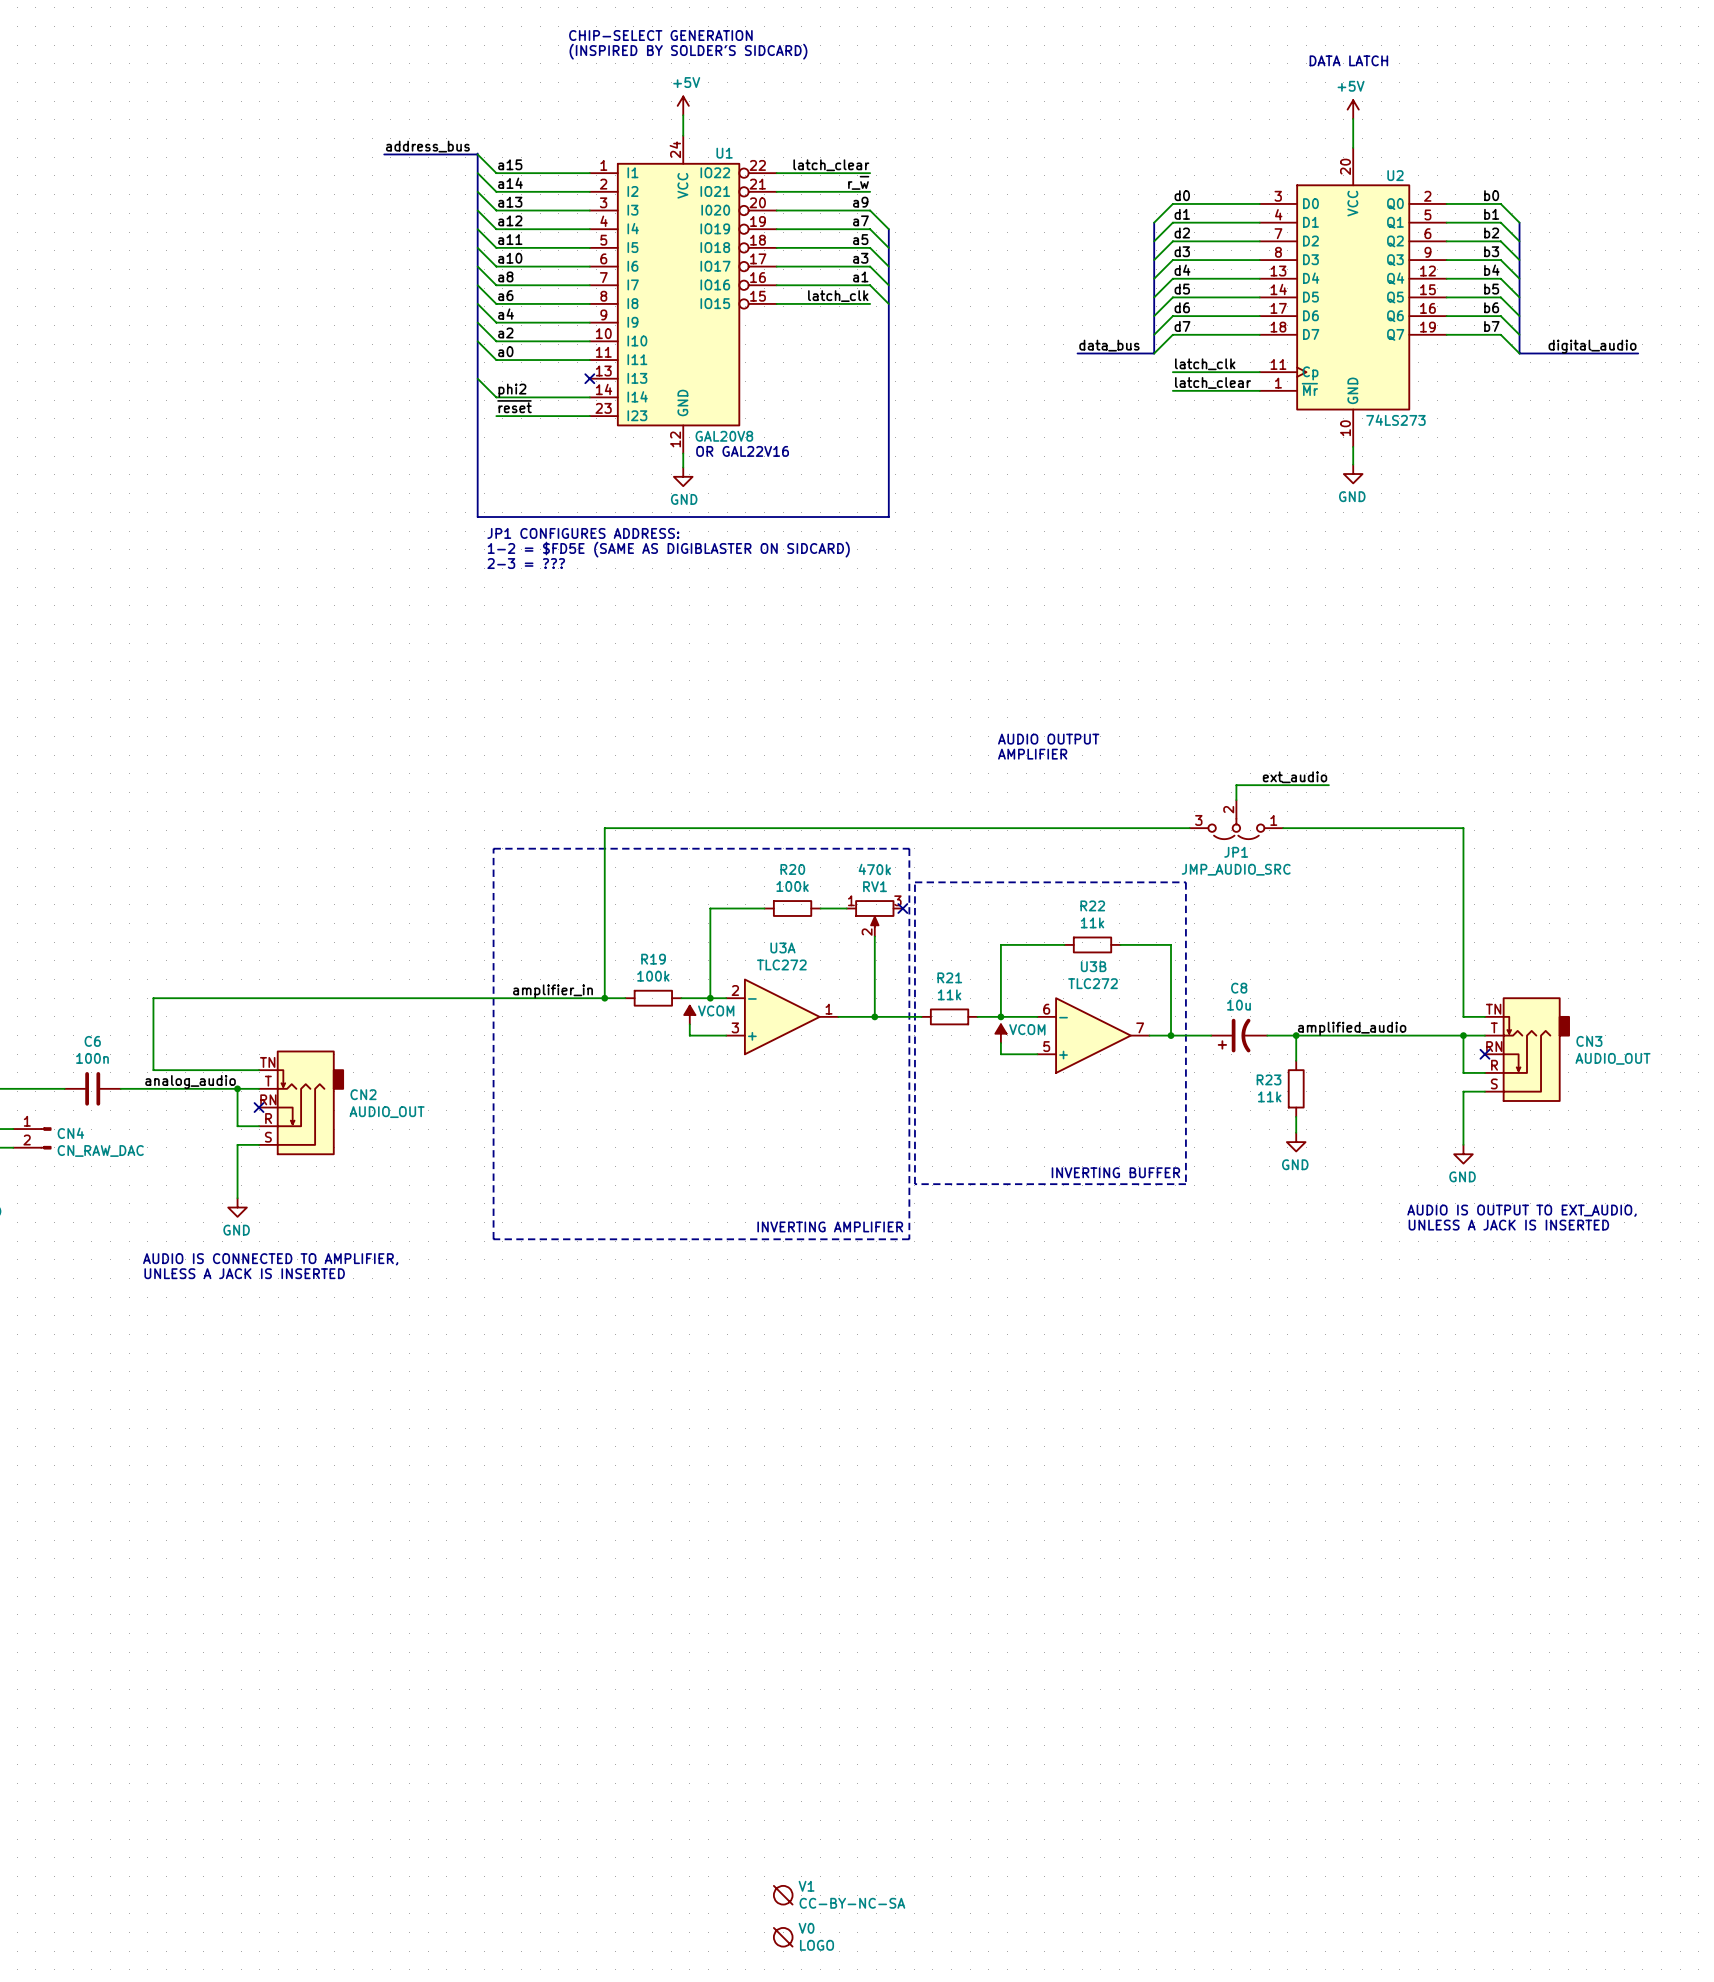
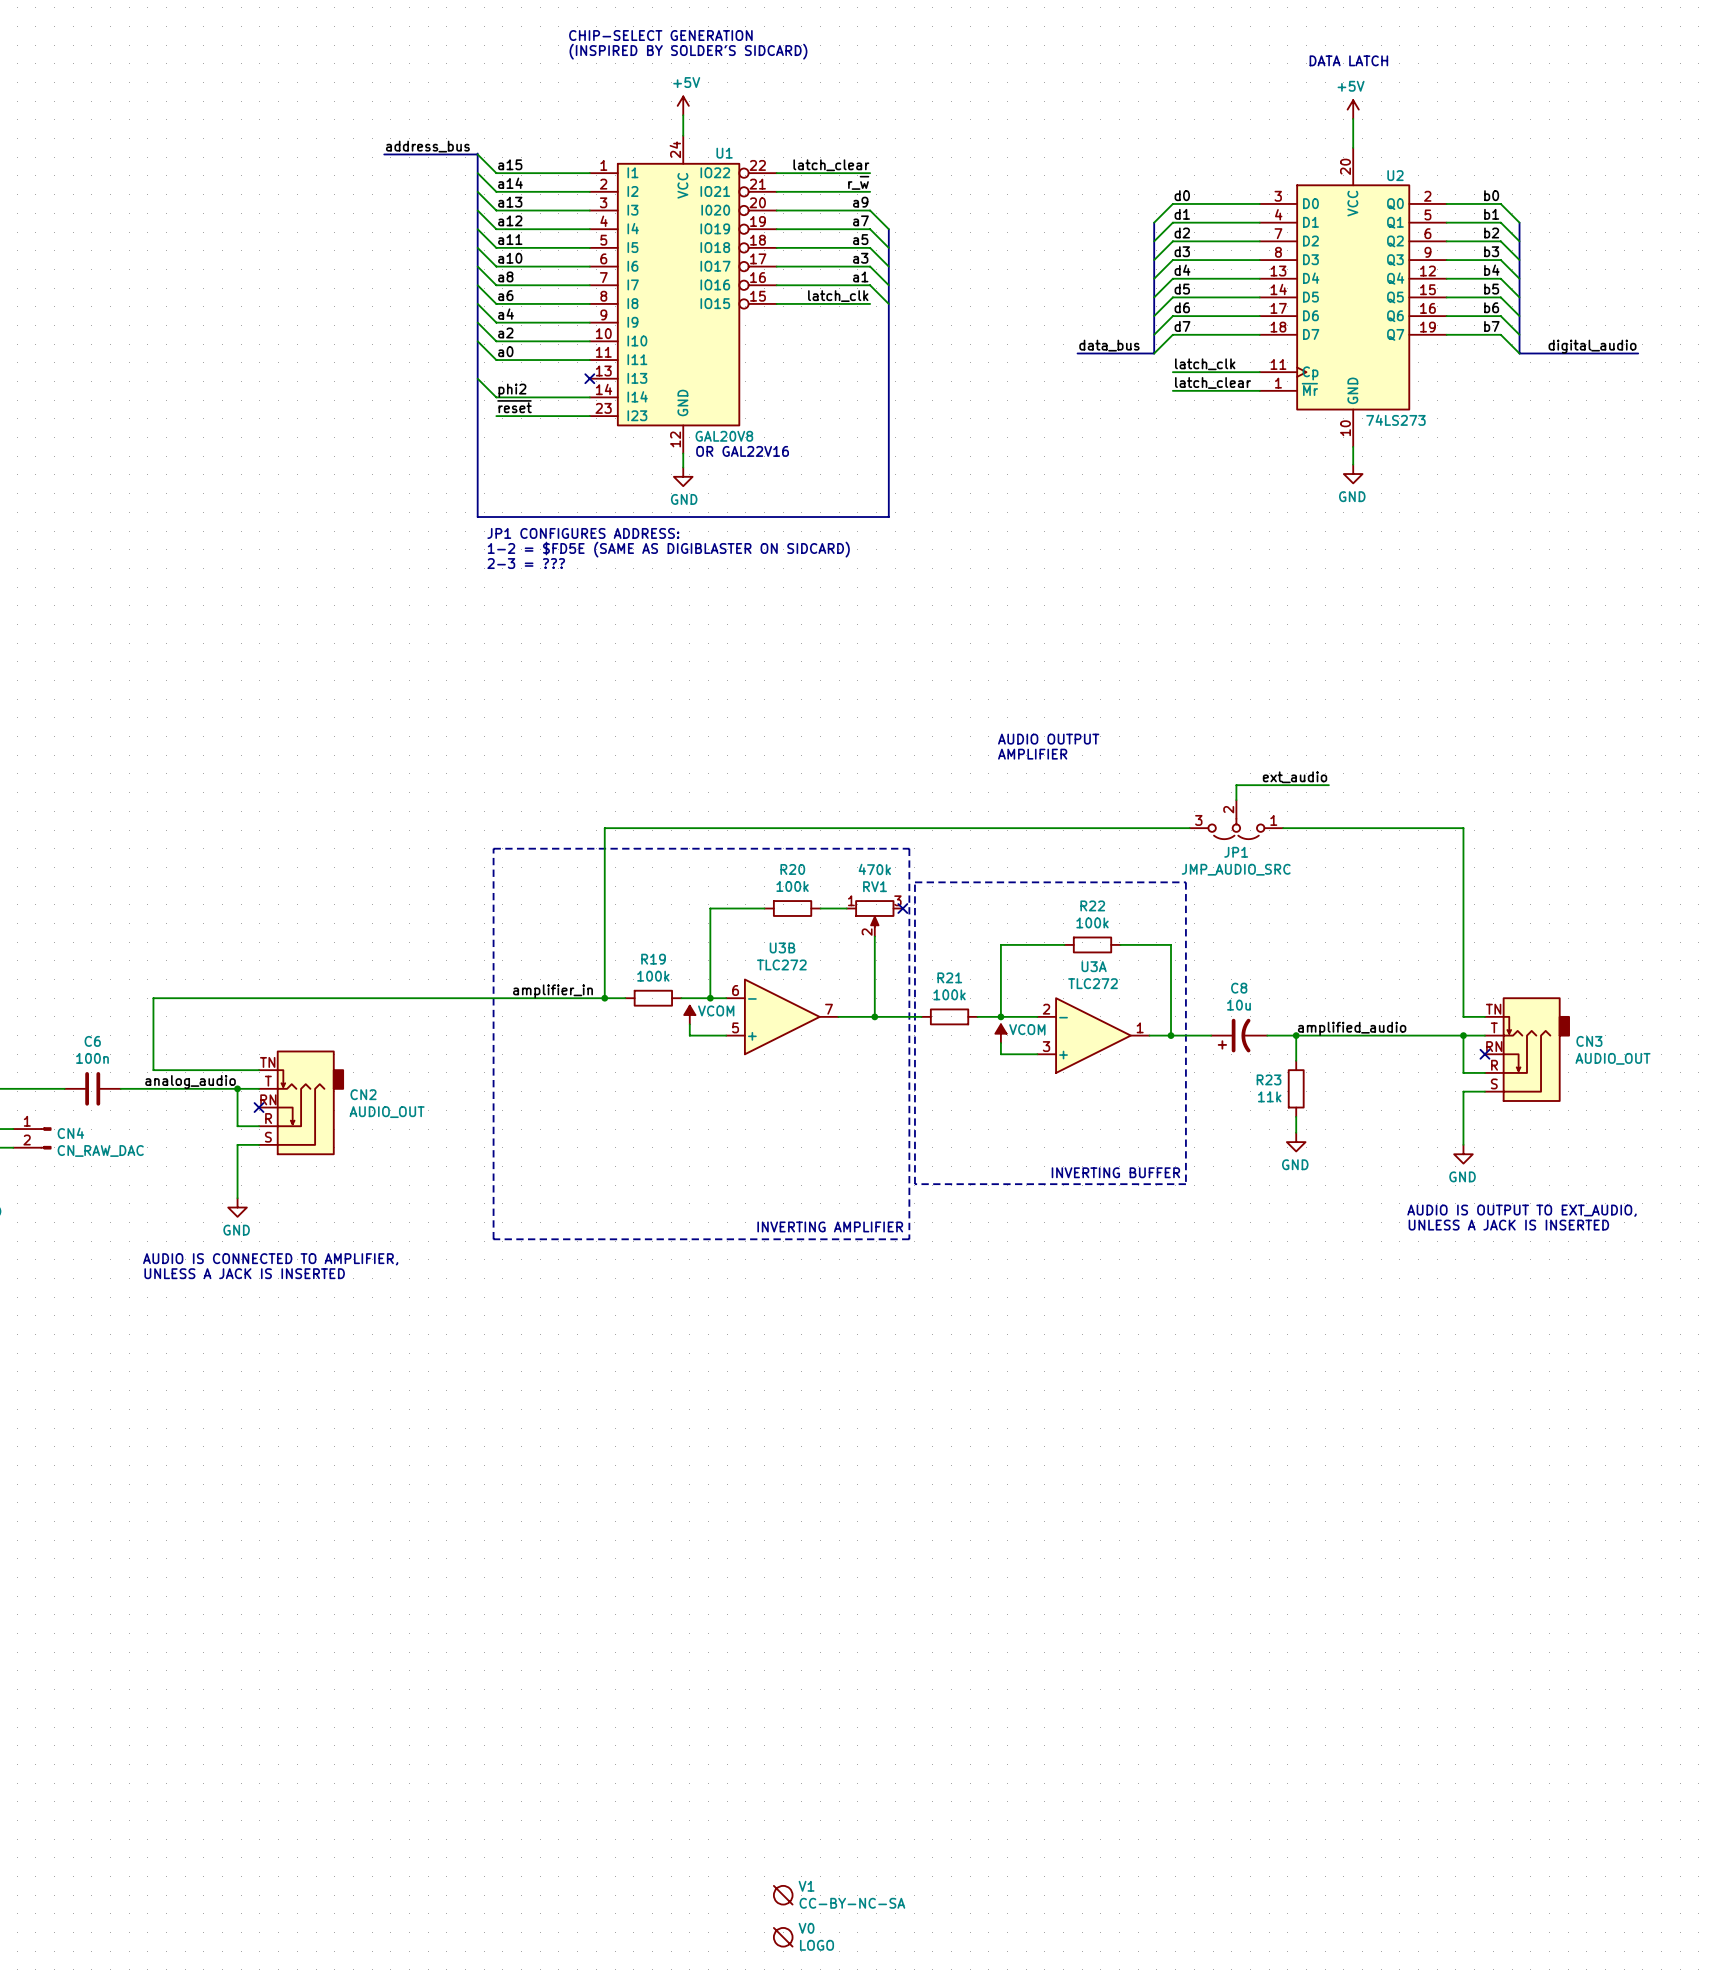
R22 value: 11k (1092, 922) -> 100k (1092, 922)
R21 value: 11k (949, 994) -> 100k (949, 994)
U3A position: (782, 1016) -> (1093, 1035)
U3B position: (1093, 1035) -> (782, 1016)

